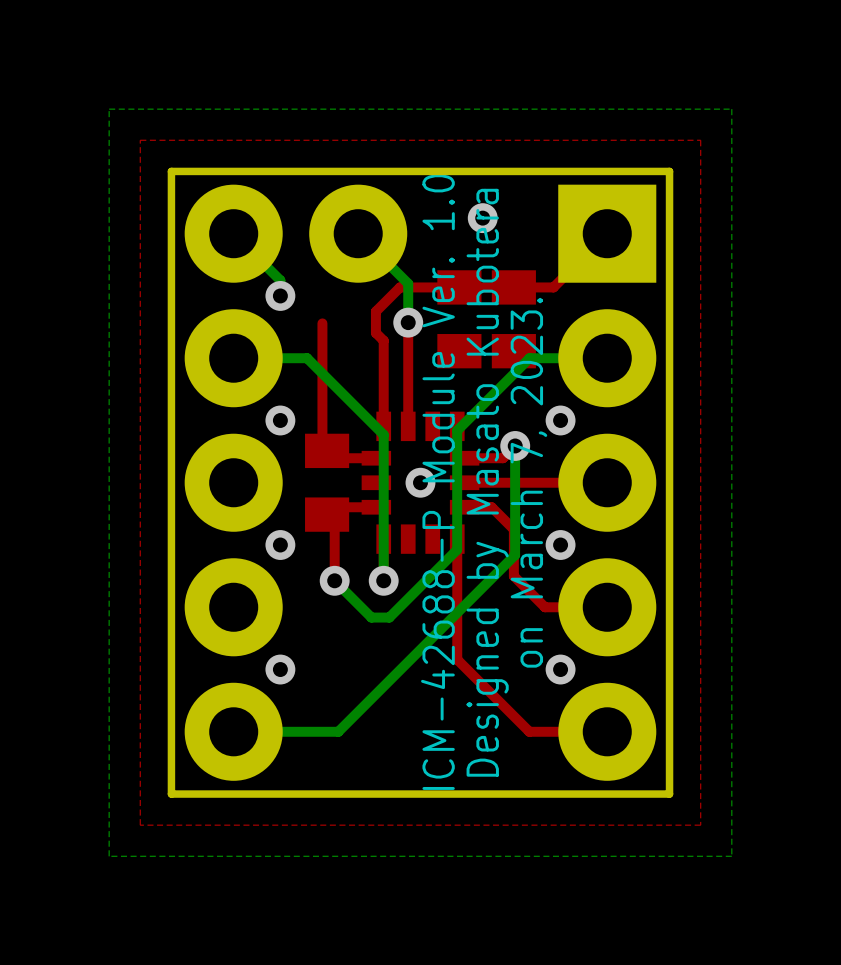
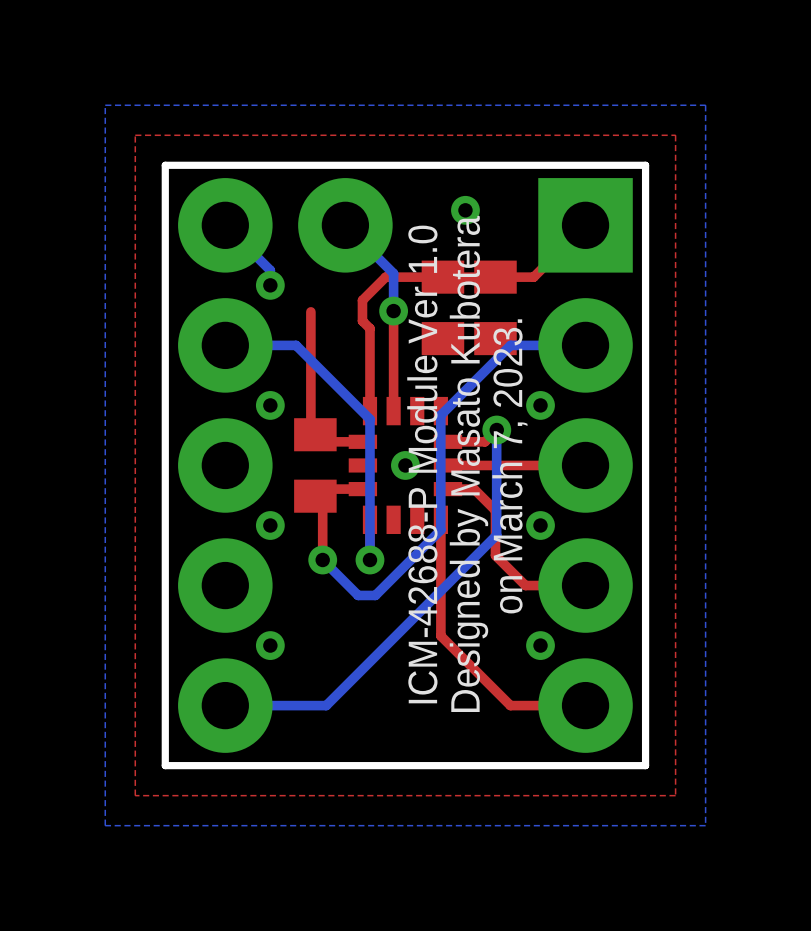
text: ICM-42688-P Module Ver. 1.0 (437, 482) -> ICM-42688-P Module Ver 1.0 (422, 464)

